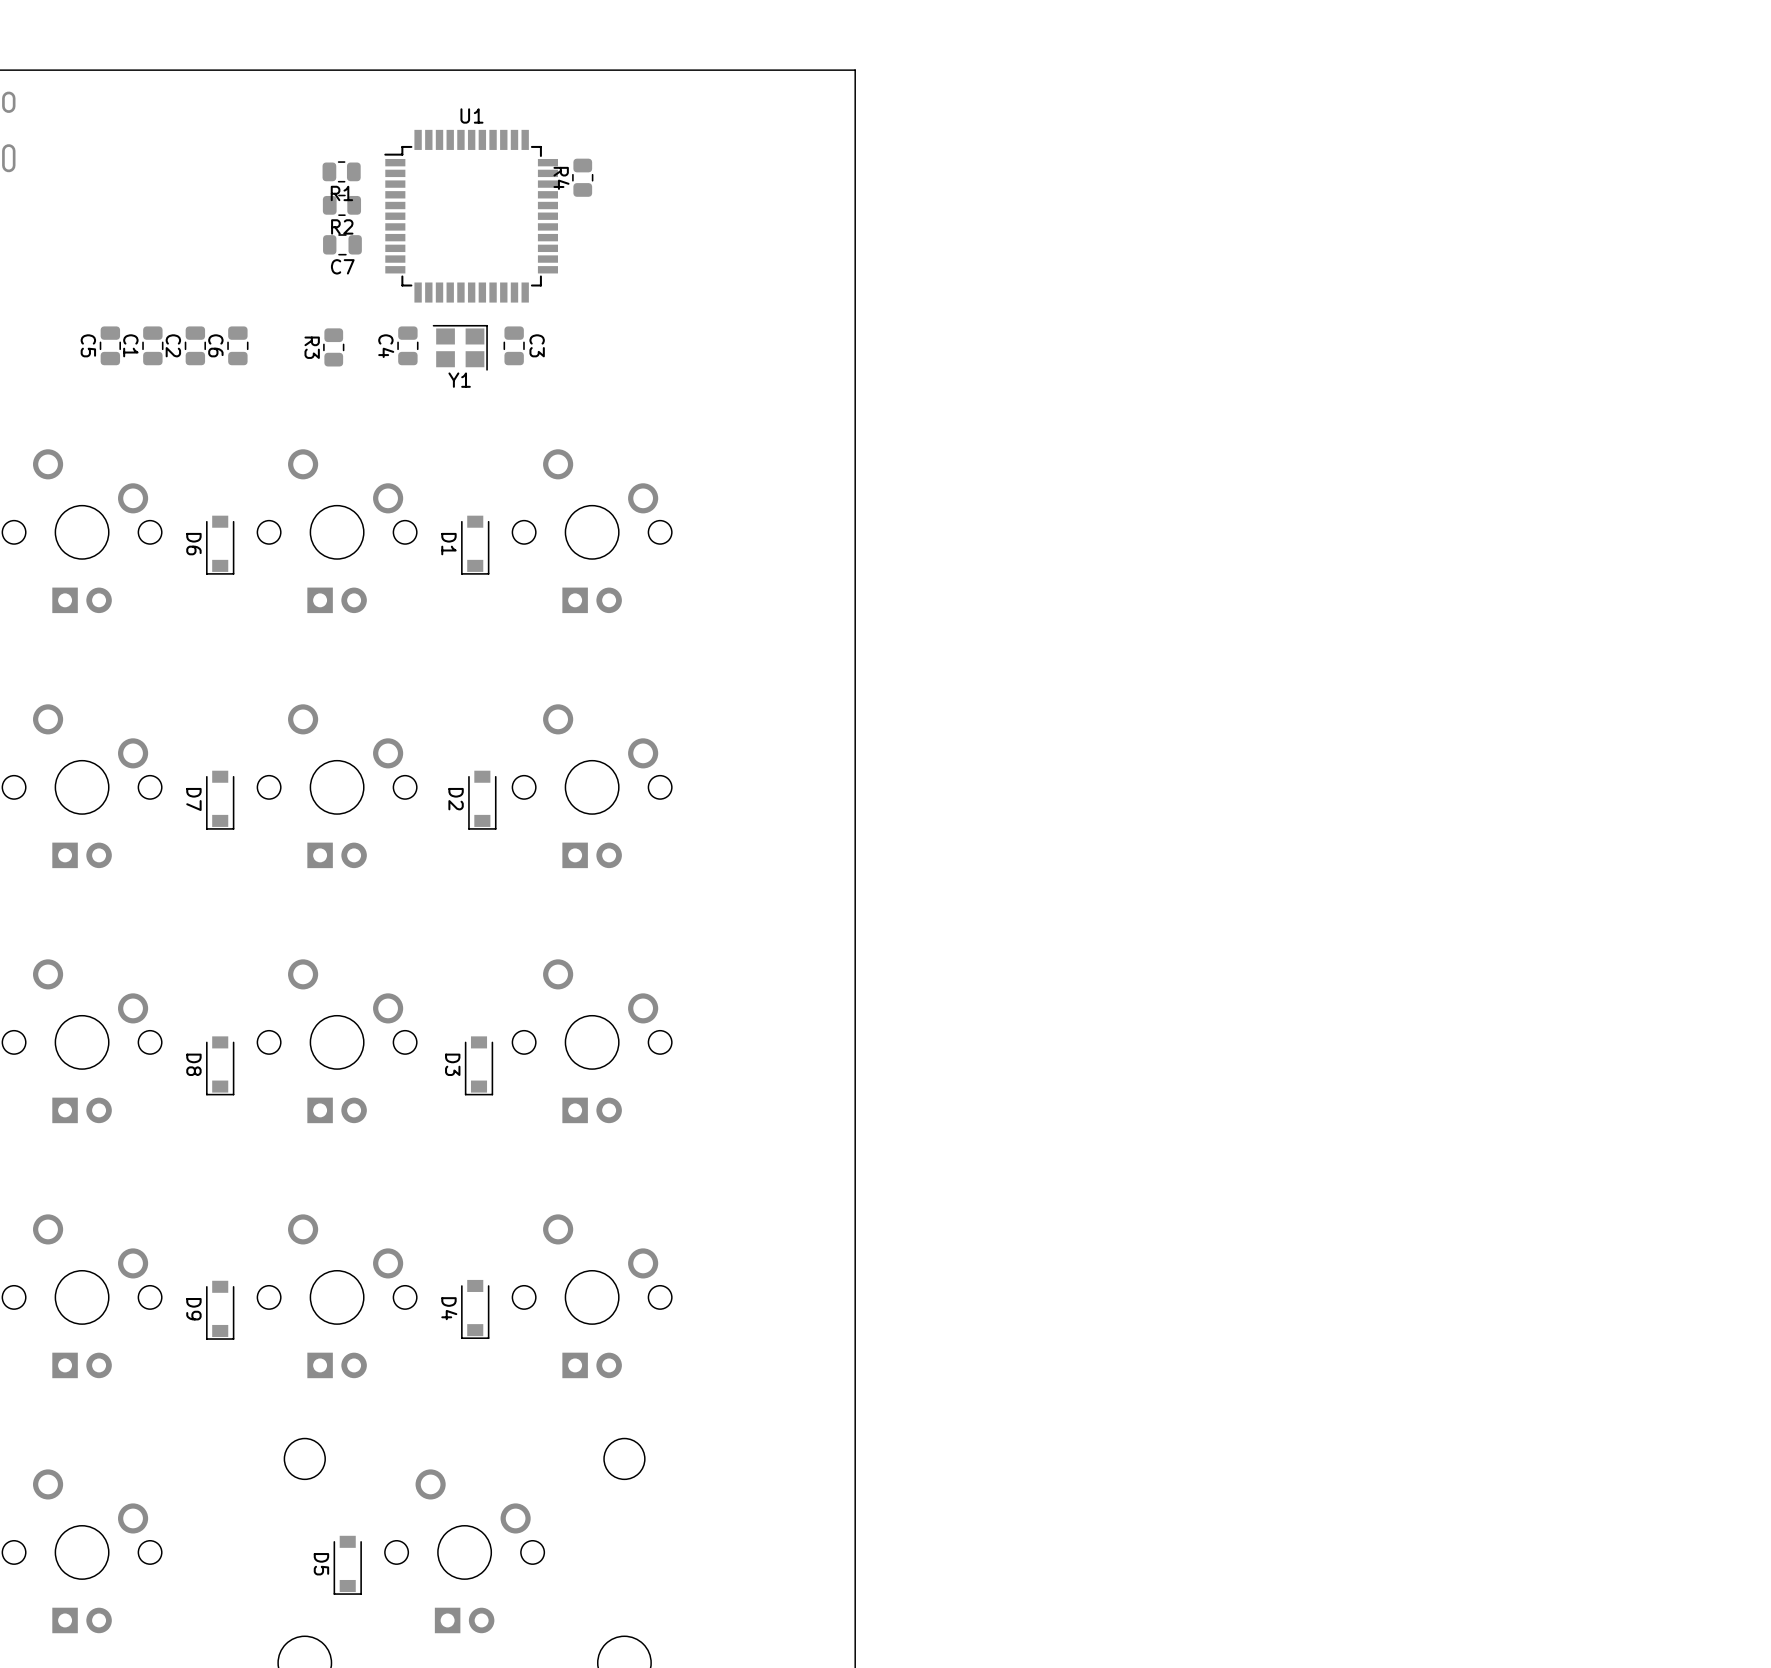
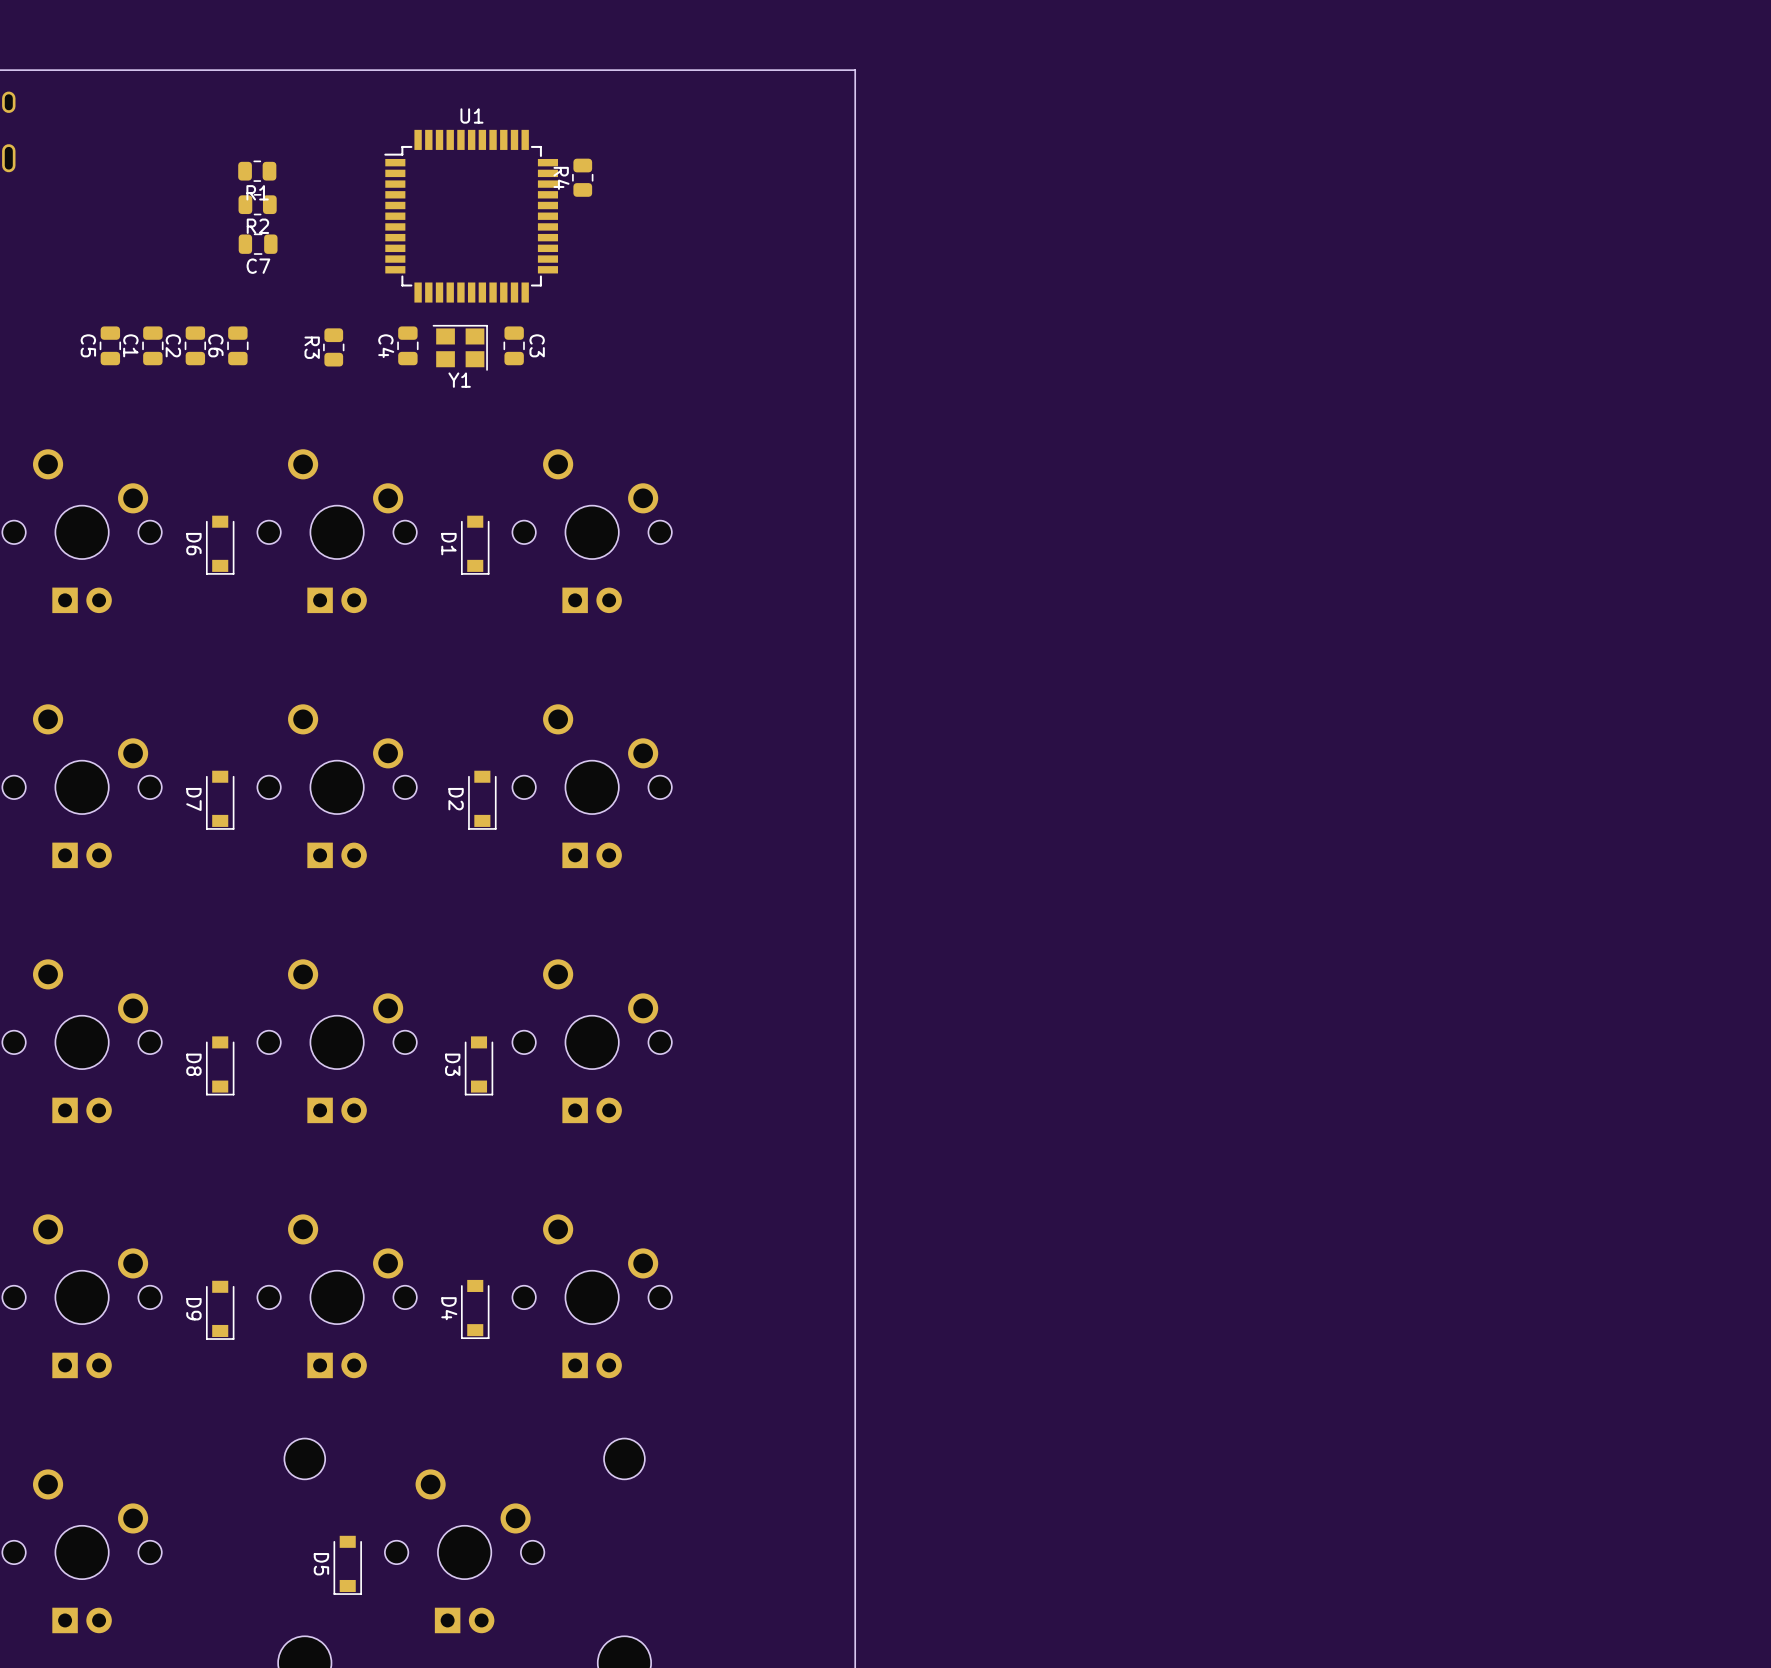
R1 position: (341, 171) -> (257, 171)
R2 position: (341, 205) -> (257, 204)
C7 position: (342, 244) -> (258, 244)

